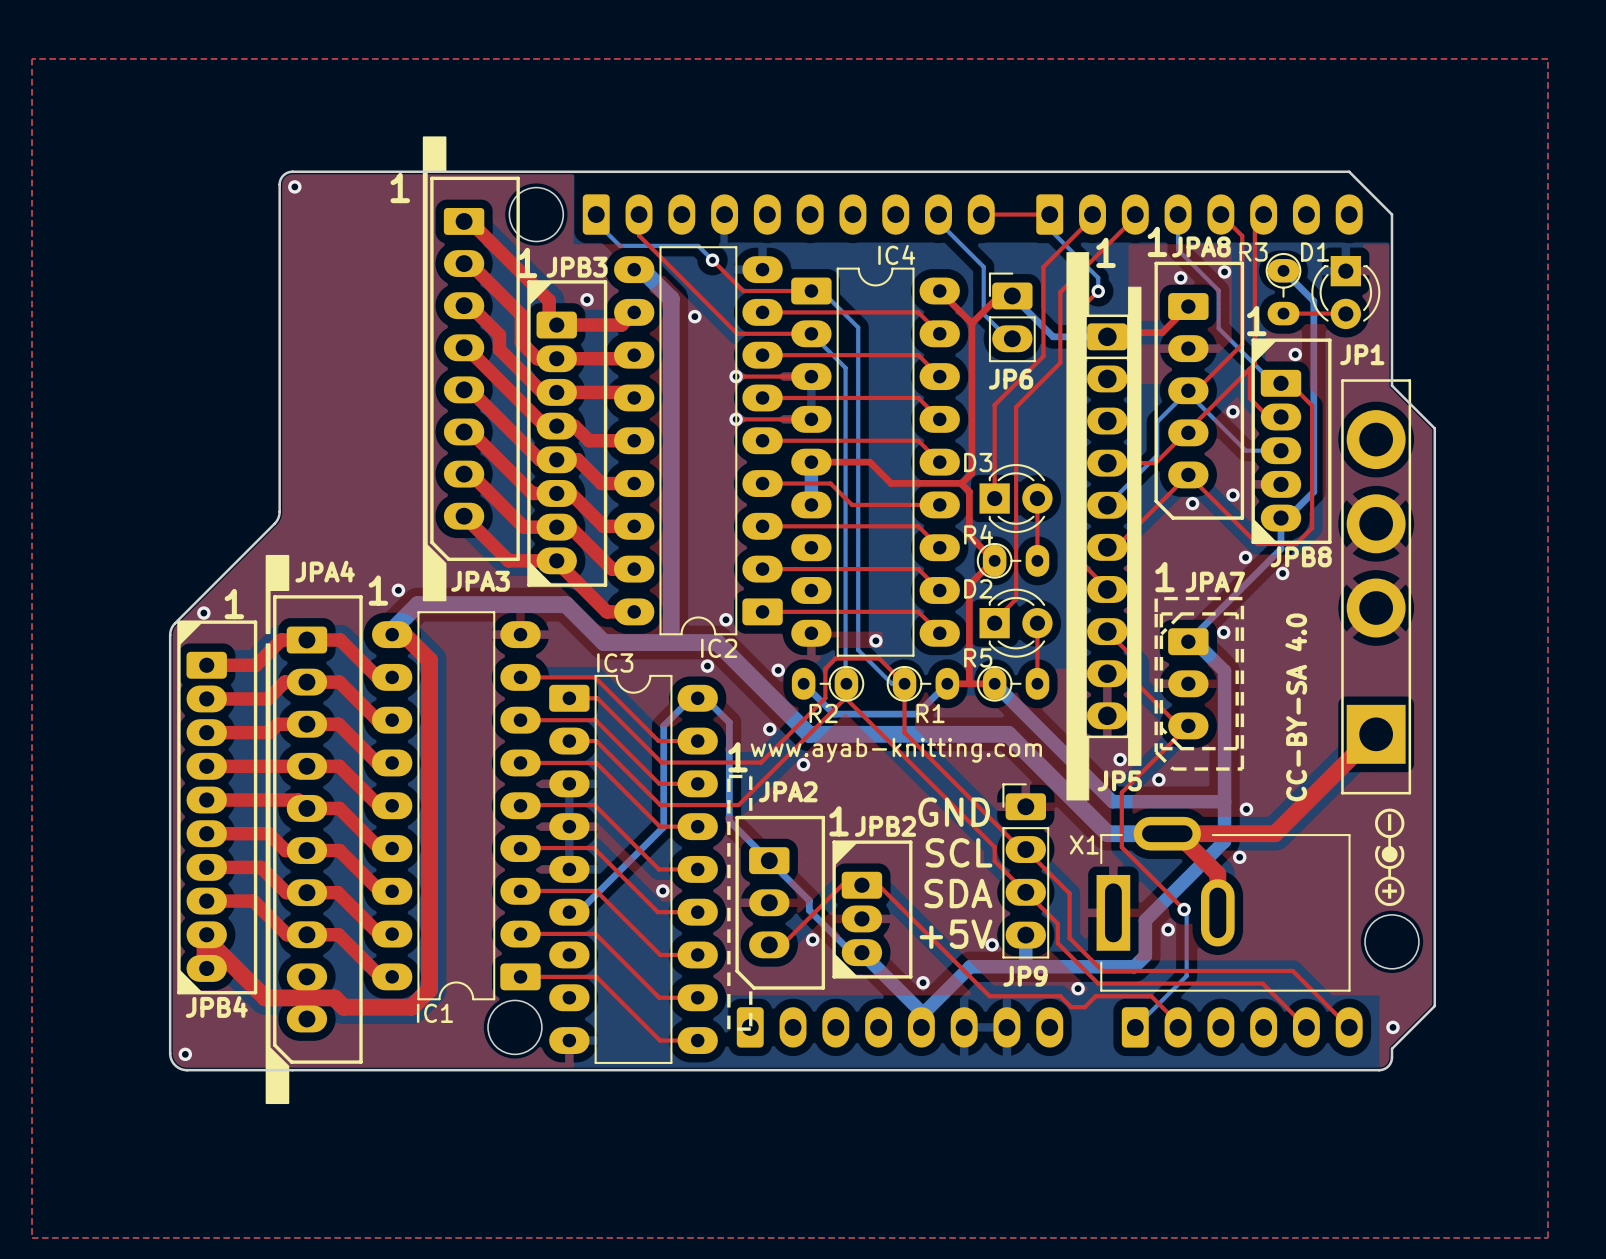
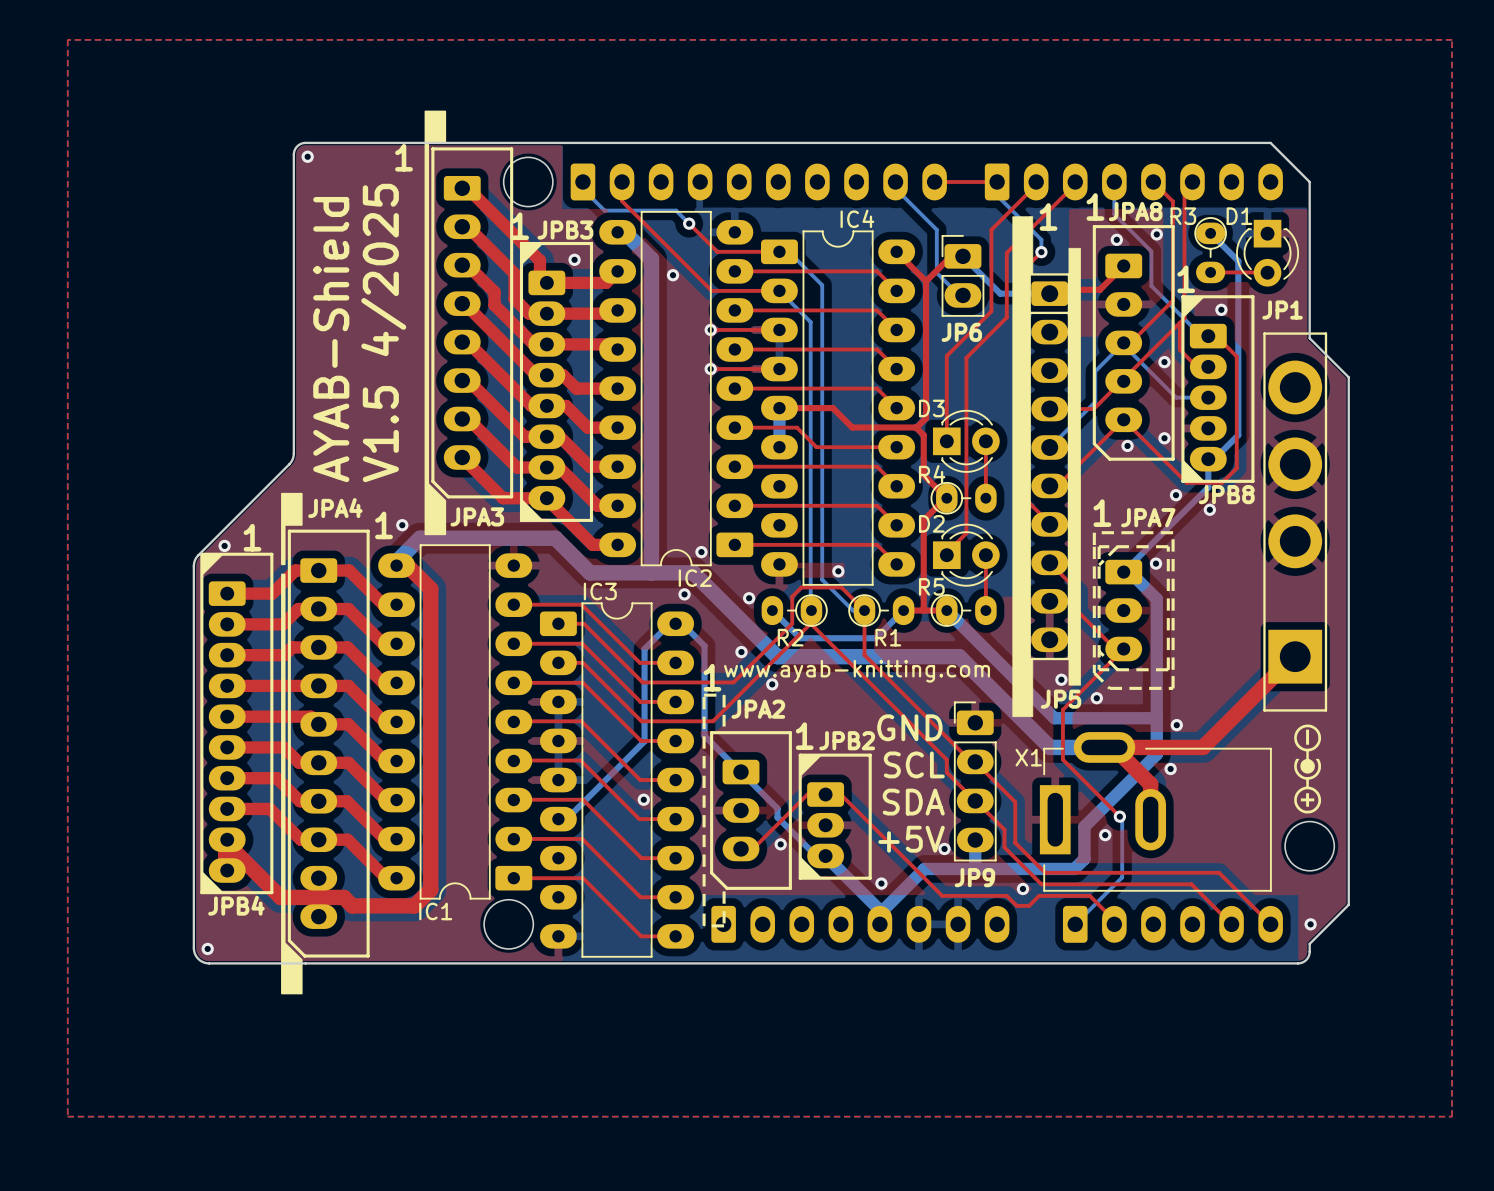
text: none -> V1.5 4/2025 (383, 332)
text: none -> AYAB-Shield (331, 339)
text: CC-BY-SA 4.0 (1296, 707) -> none

